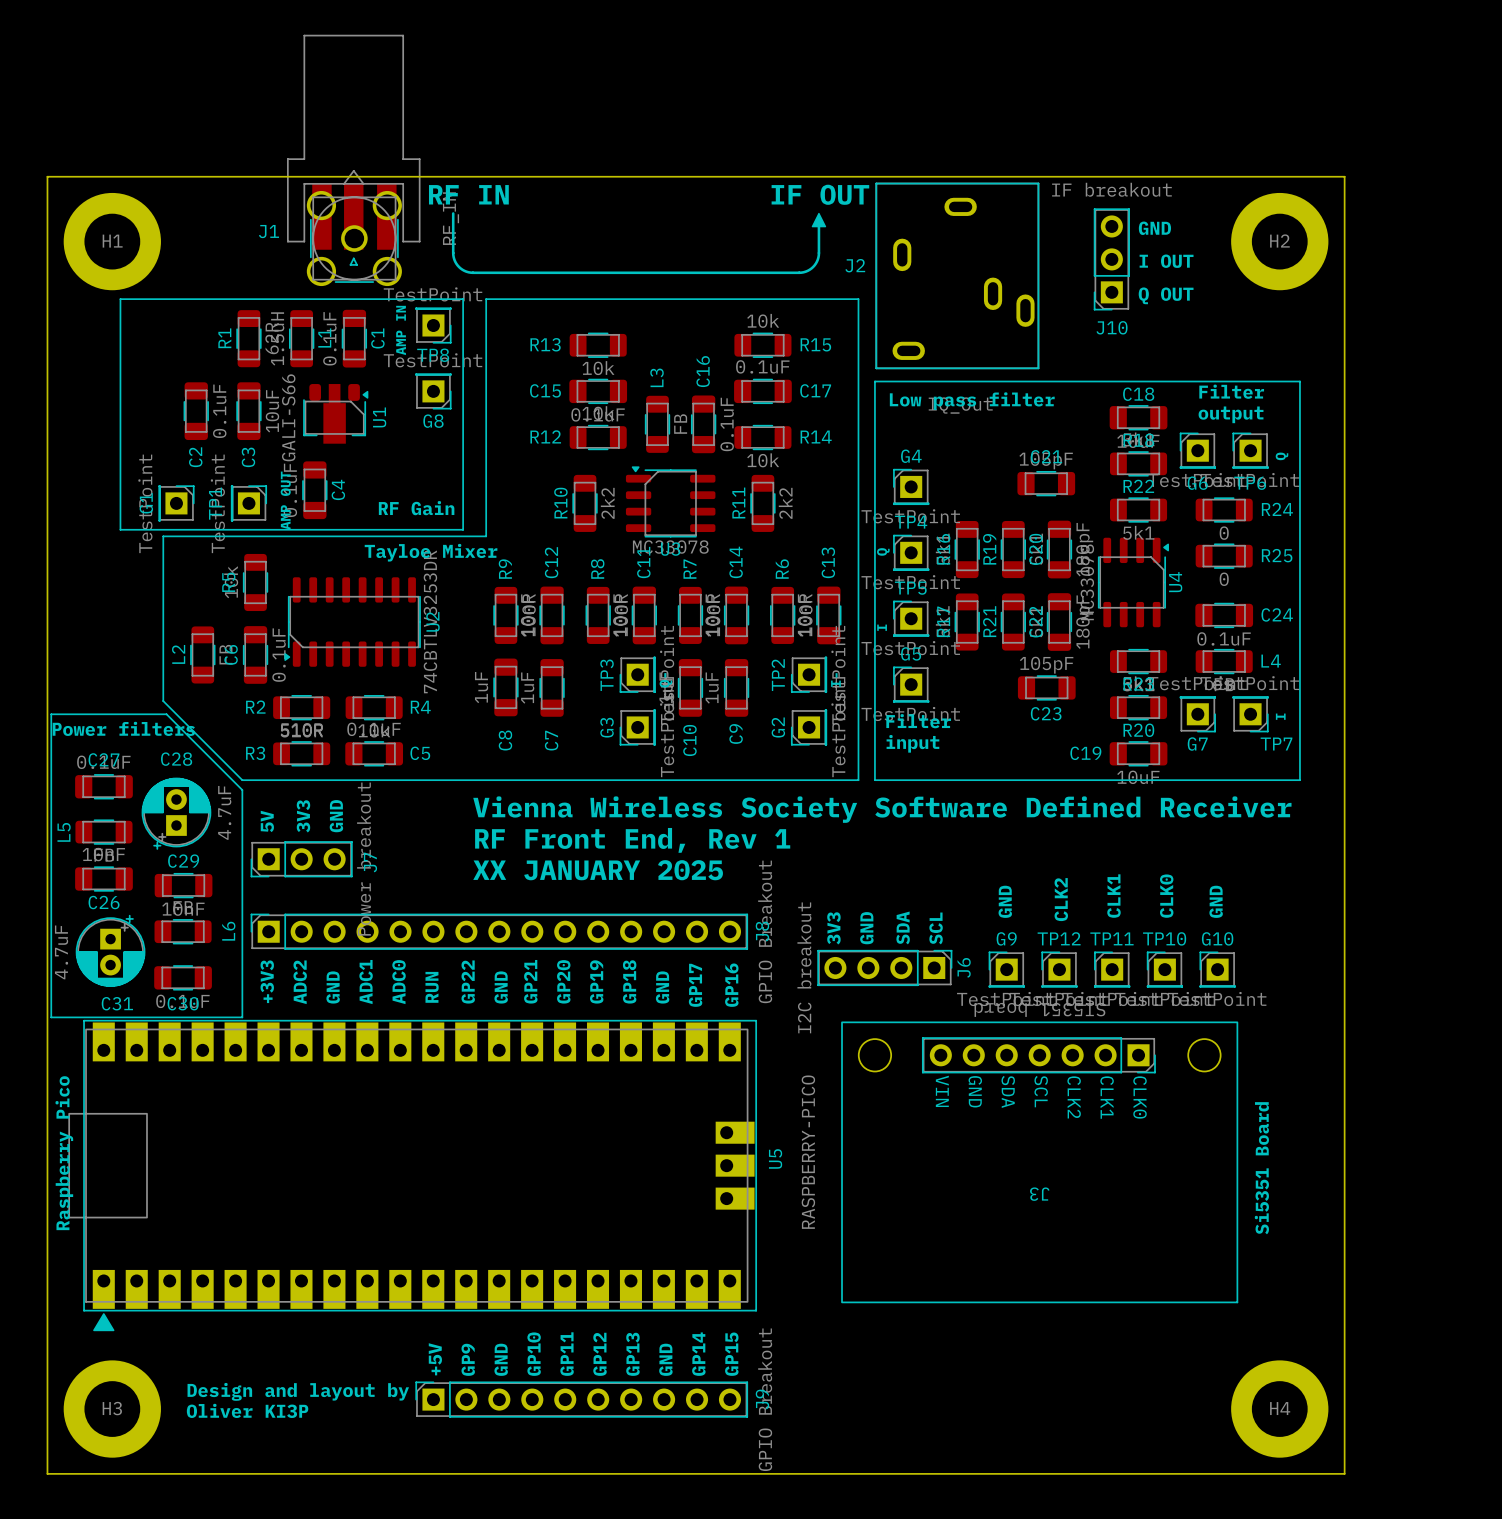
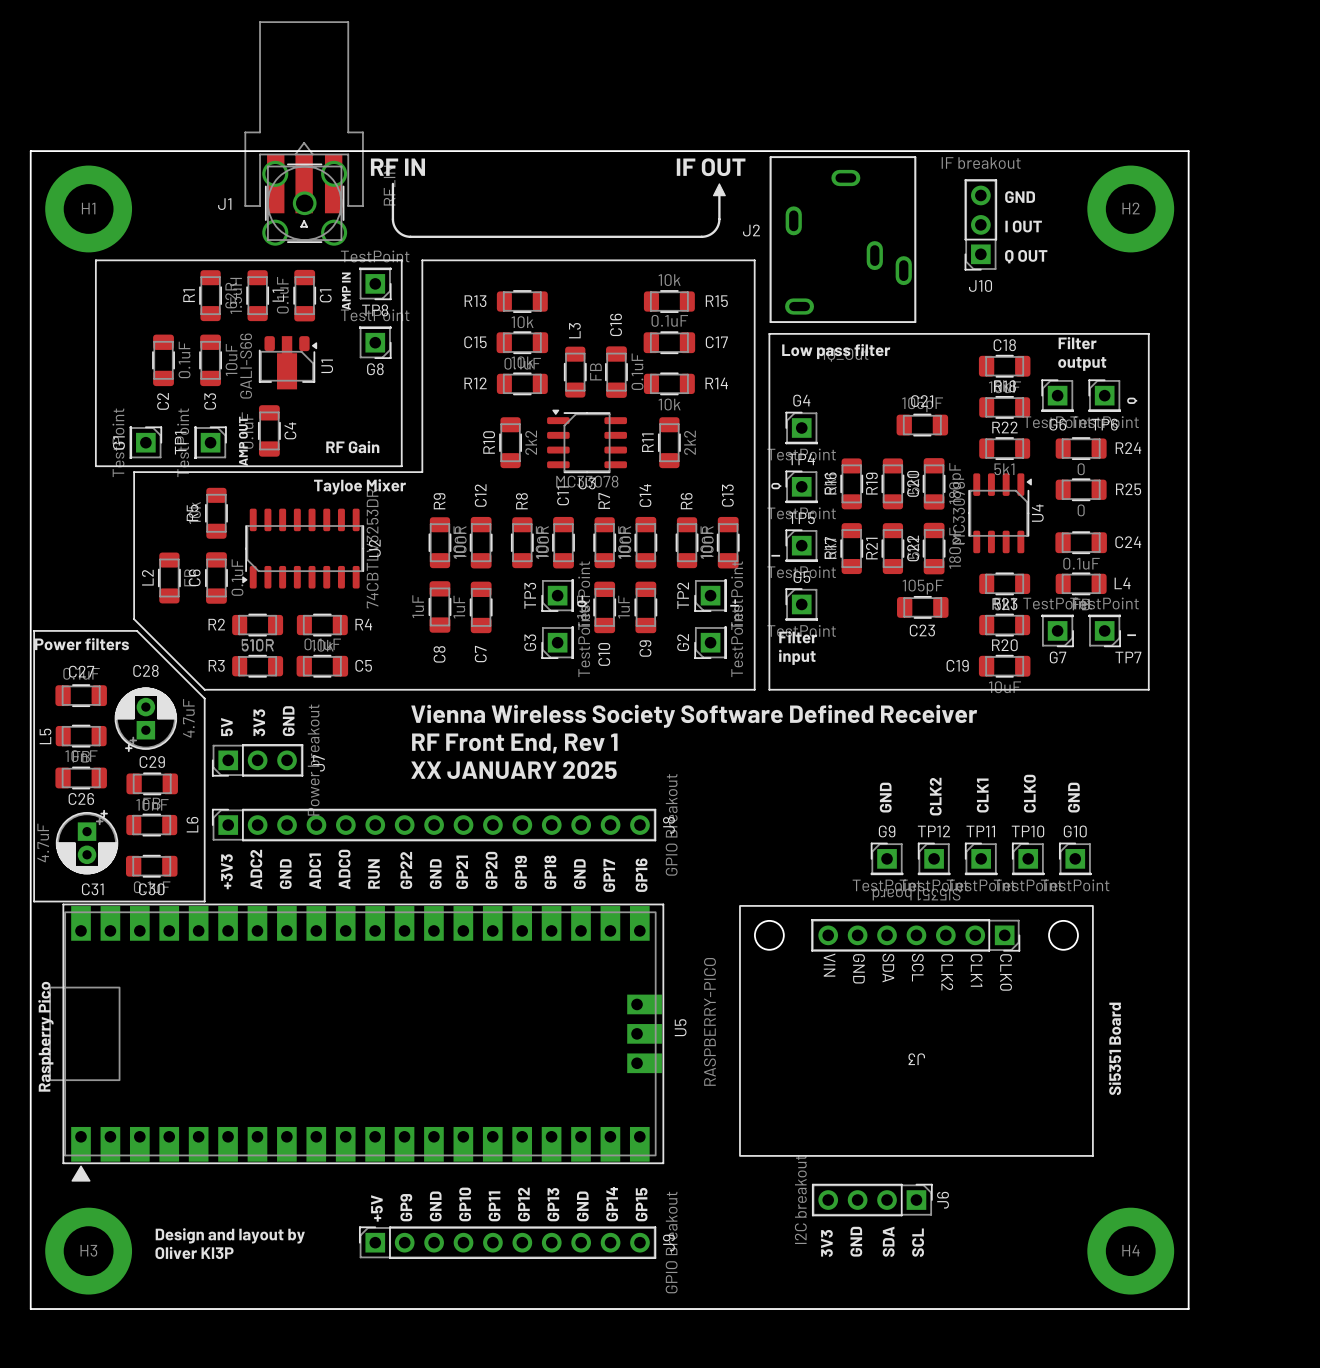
J1 footprint: [287, 34, 421, 287] -> [244, 21, 364, 246]
text: SDA (903, 927) -> none
text: 3V3 (833, 928) -> none
text: GND (866, 928) -> none
text: SCL (936, 928) -> none
J6 position: (884, 967) -> (872, 1200)
text: none -> 3V3 (826, 1243)
text: none -> GND (856, 1241)
text: none -> SDA (888, 1241)
text: none -> SCL (918, 1242)

